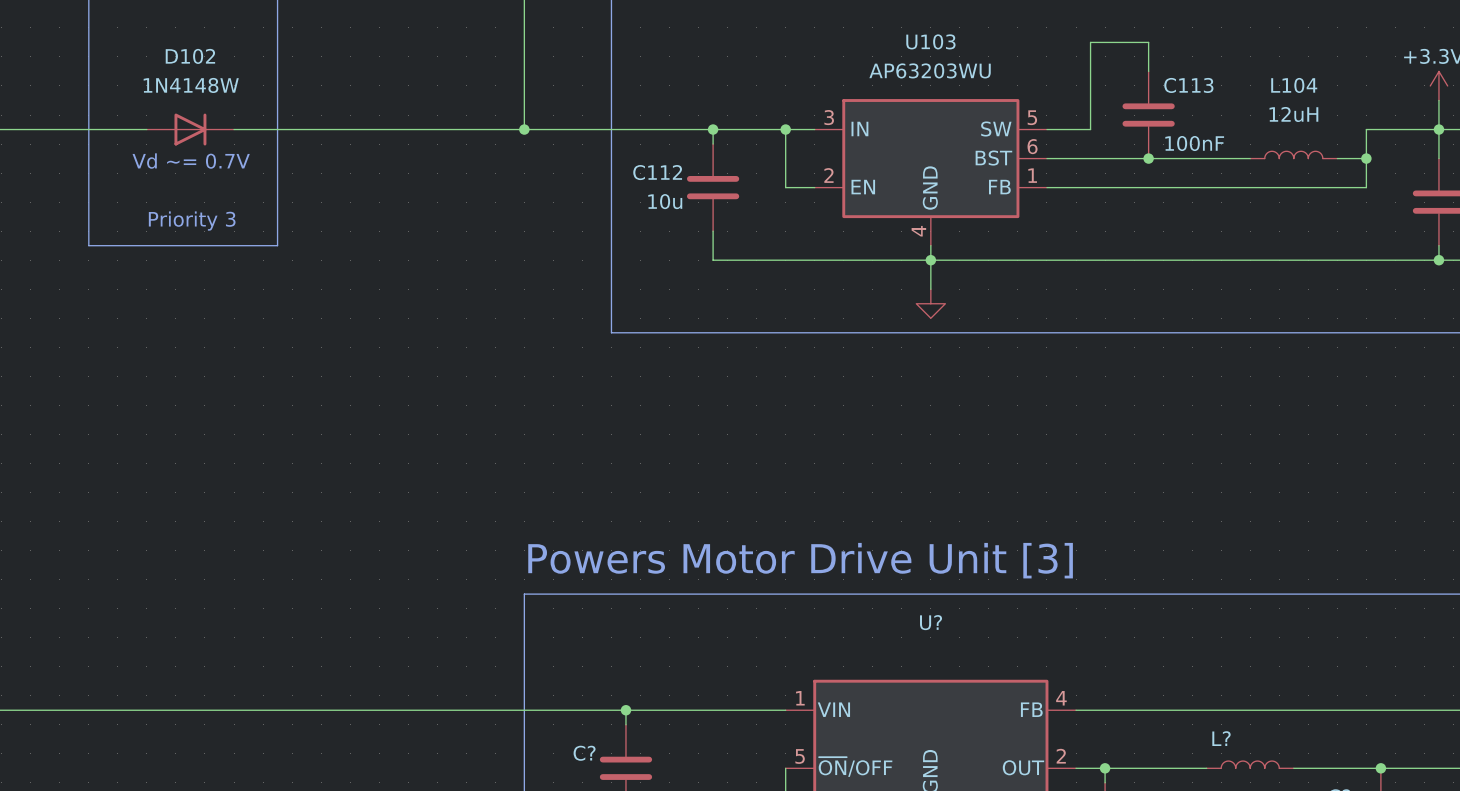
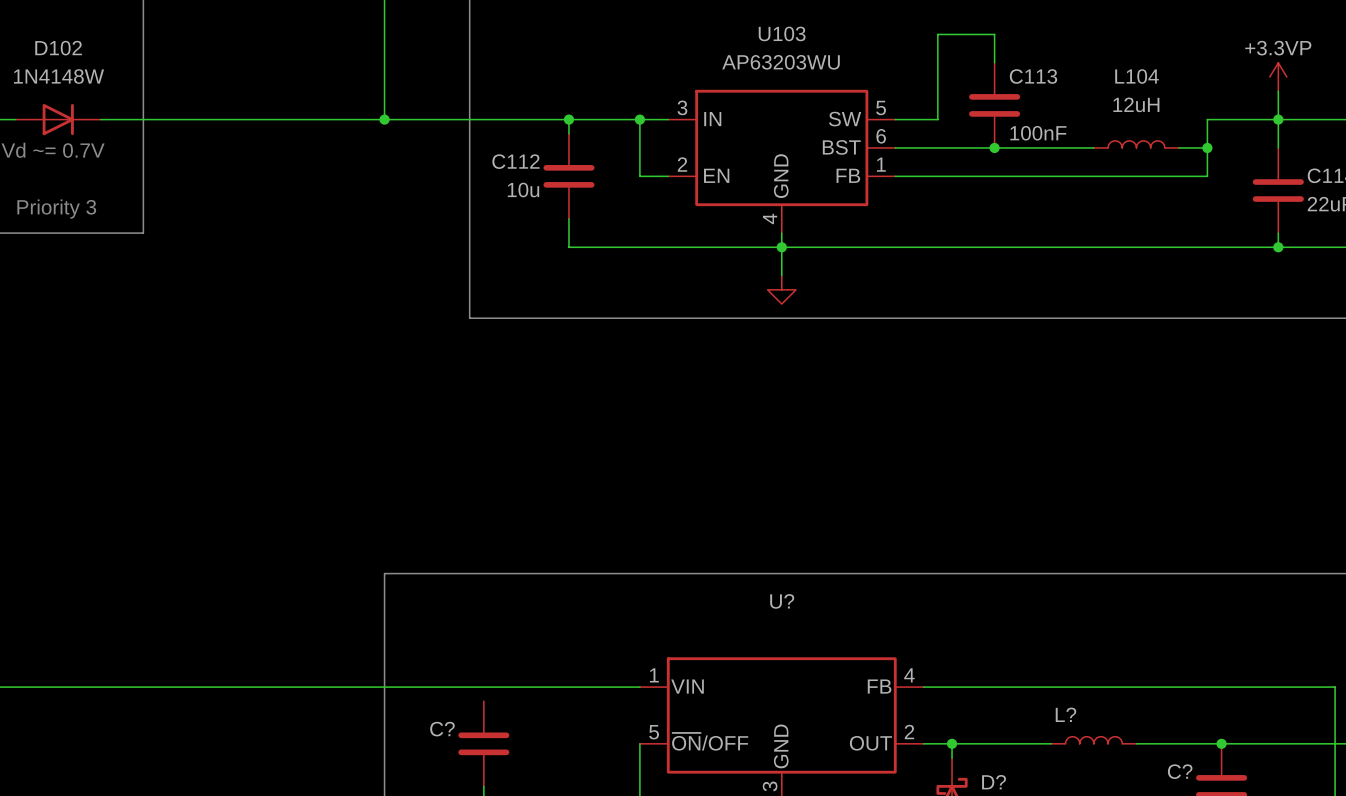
text: Powers Motor Drive Unit [3] (800, 560) -> none
wire: (625, 710) (625, 724) -> none
junction: (625, 710) -> none

